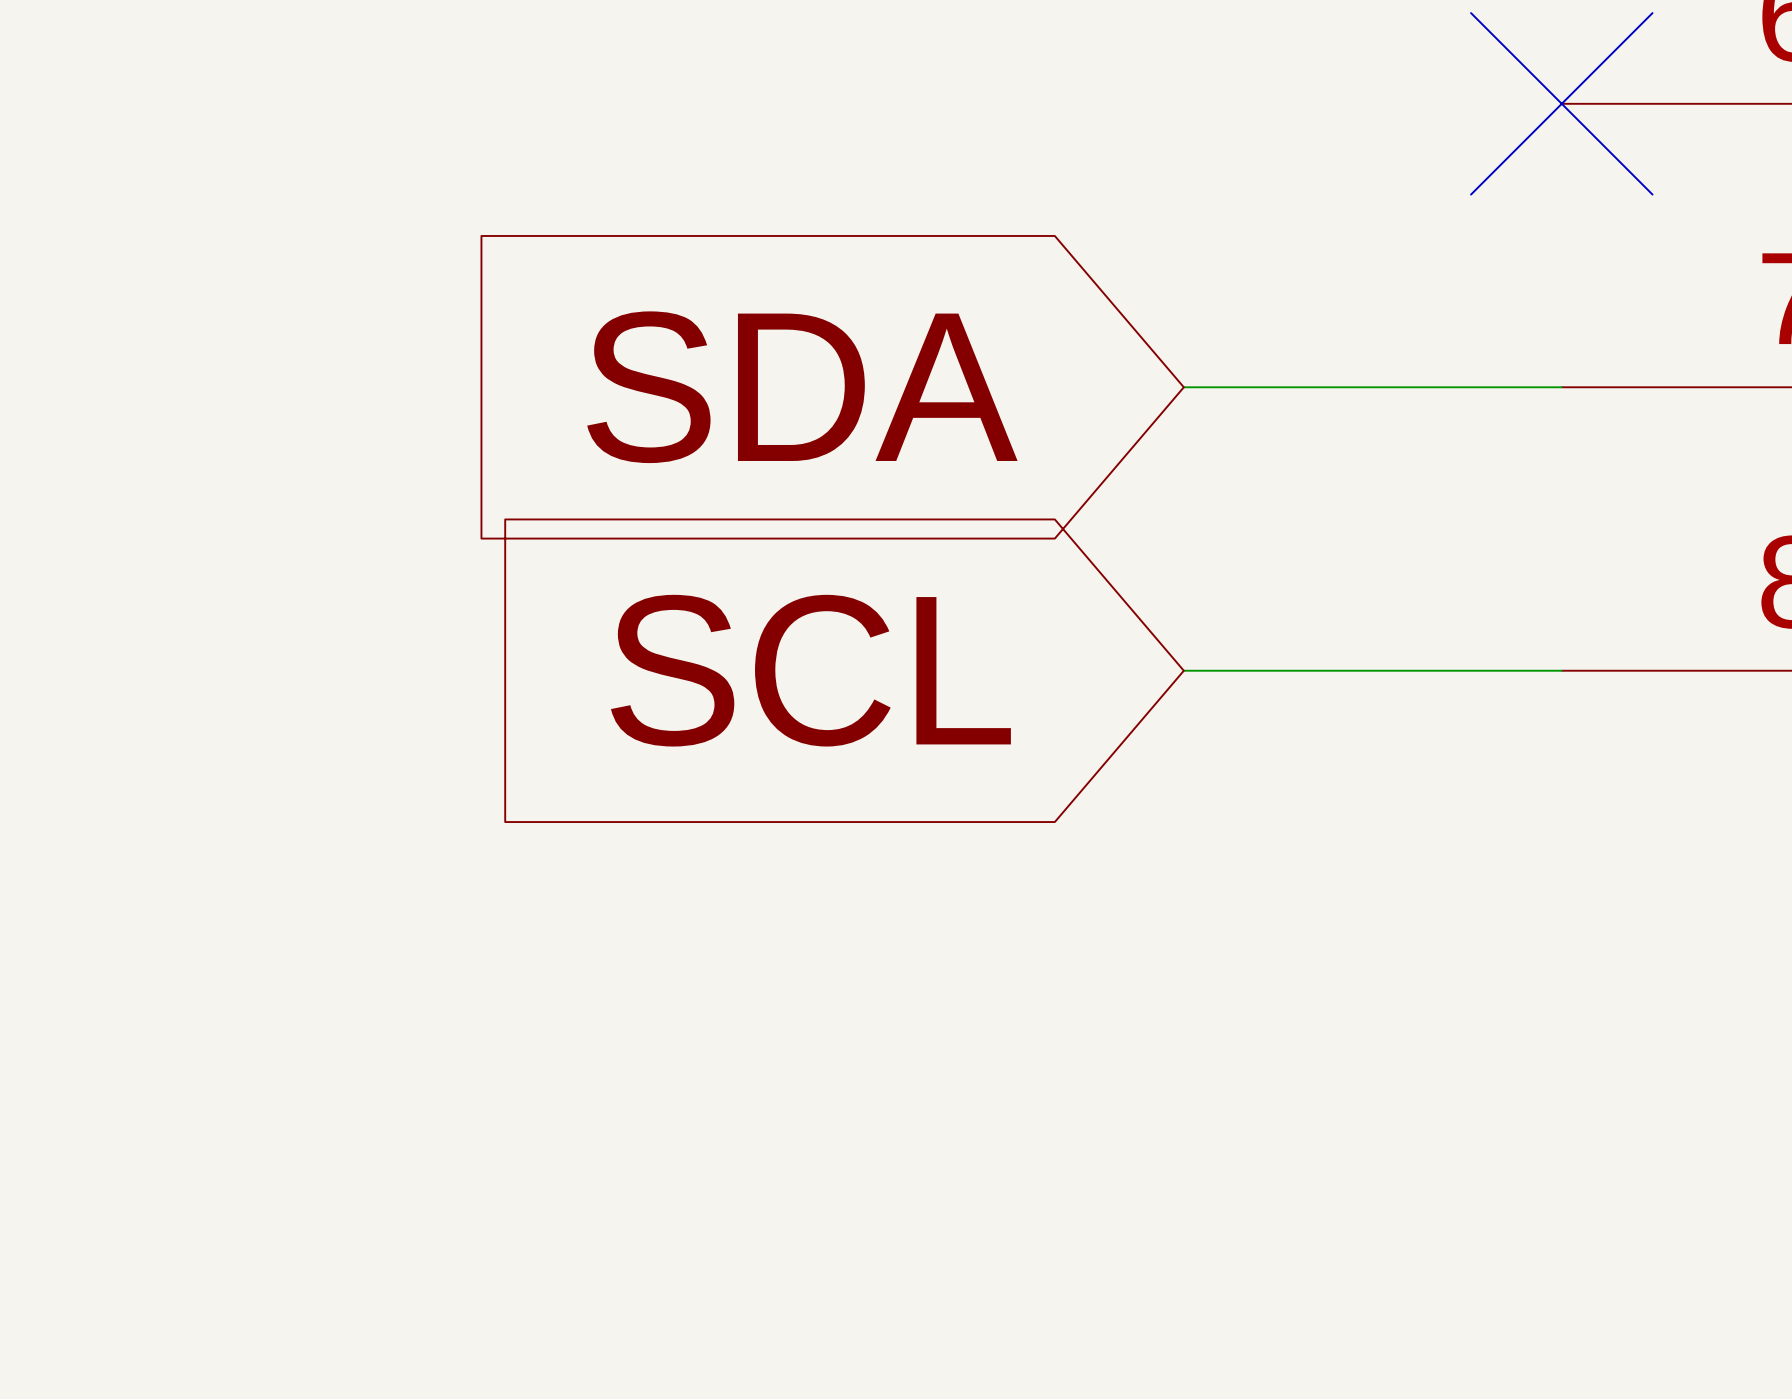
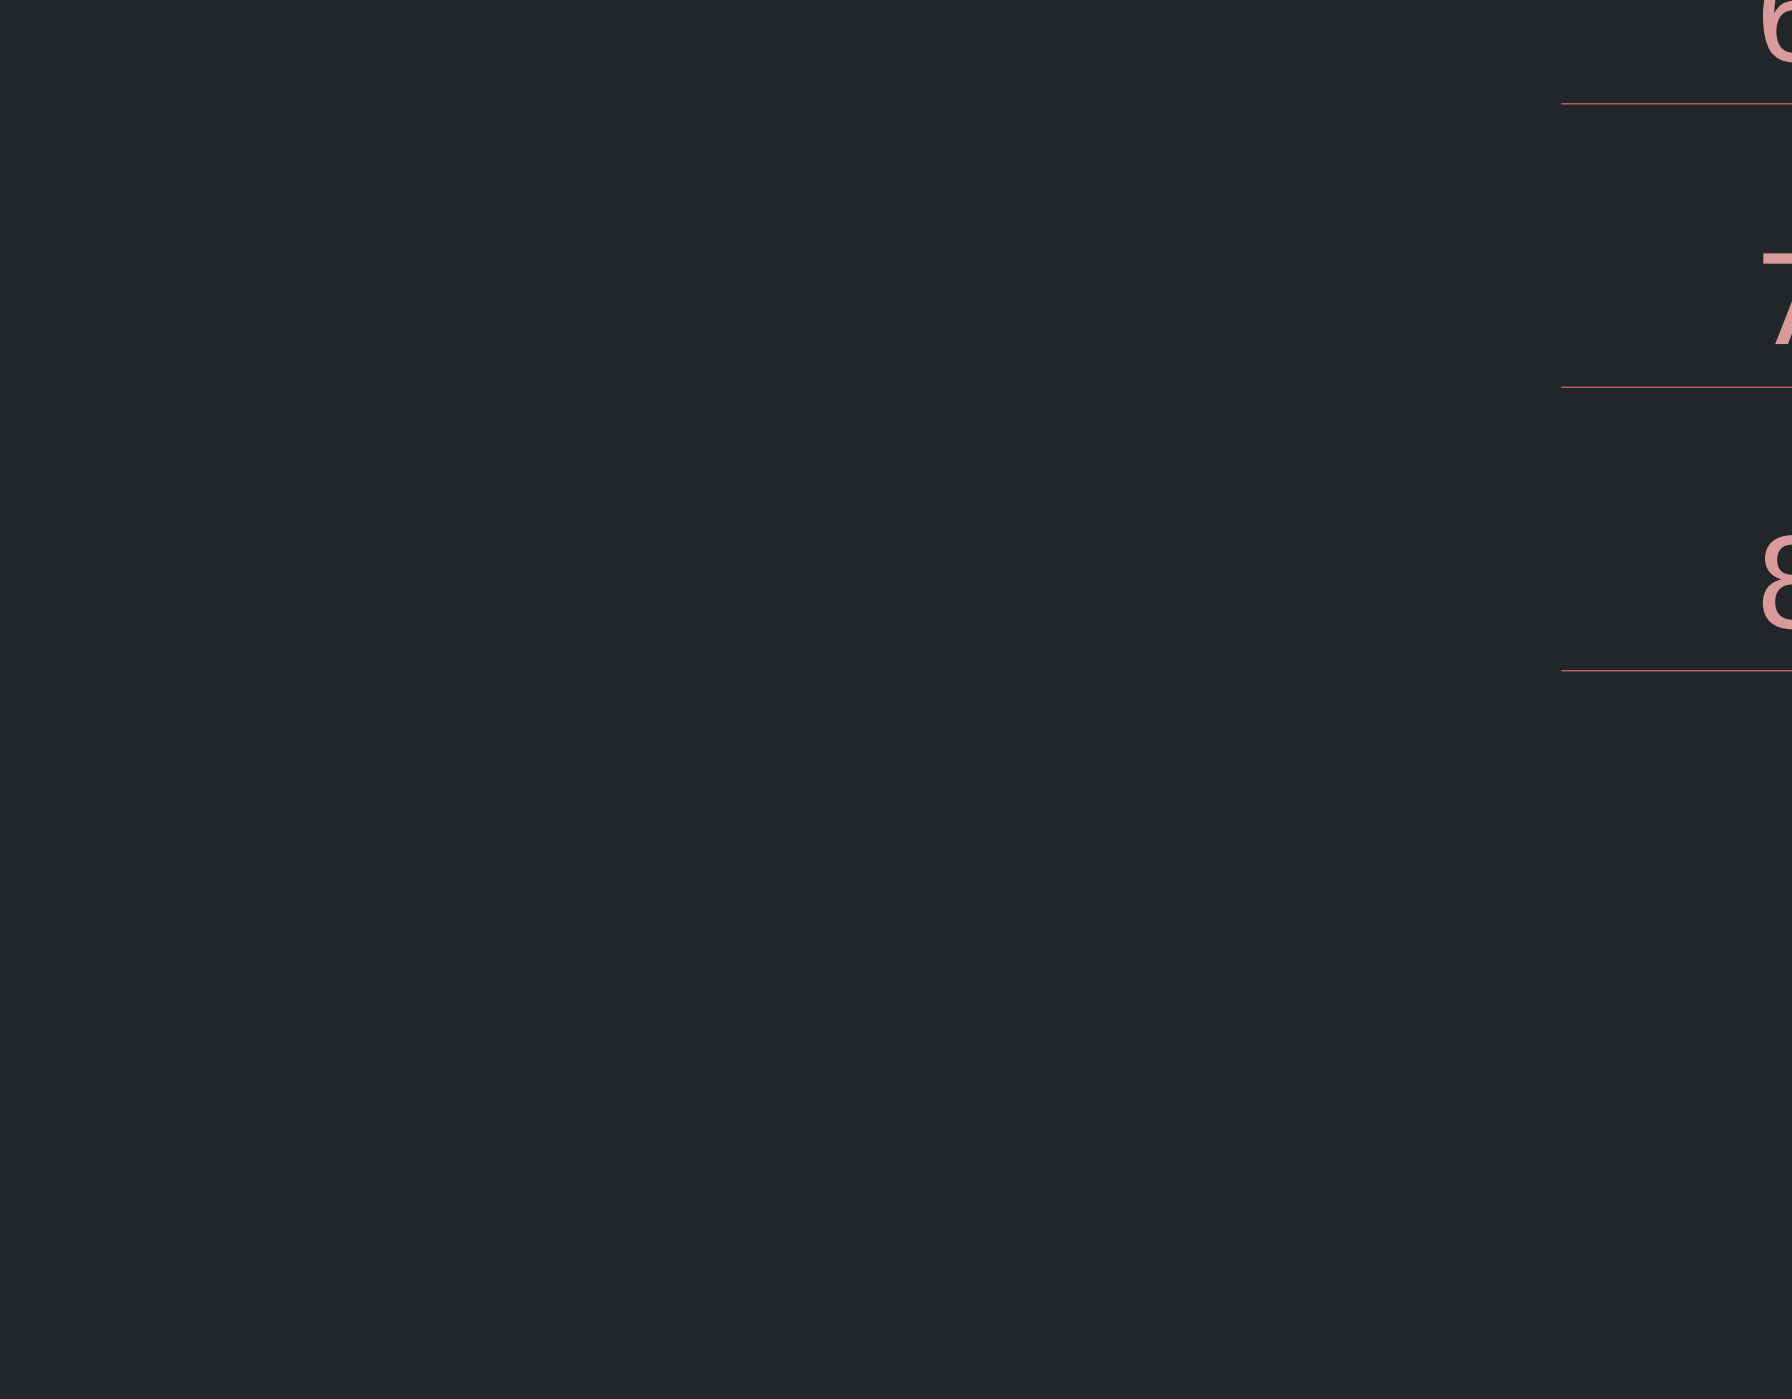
no-connect mark: (1561, 103) -> none
global label: SDA (802, 387) -> none
wire: (1183, 387) (1561, 387) -> none
global label: SCL (810, 670) -> none
wire: (1183, 670) (1561, 670) -> none

